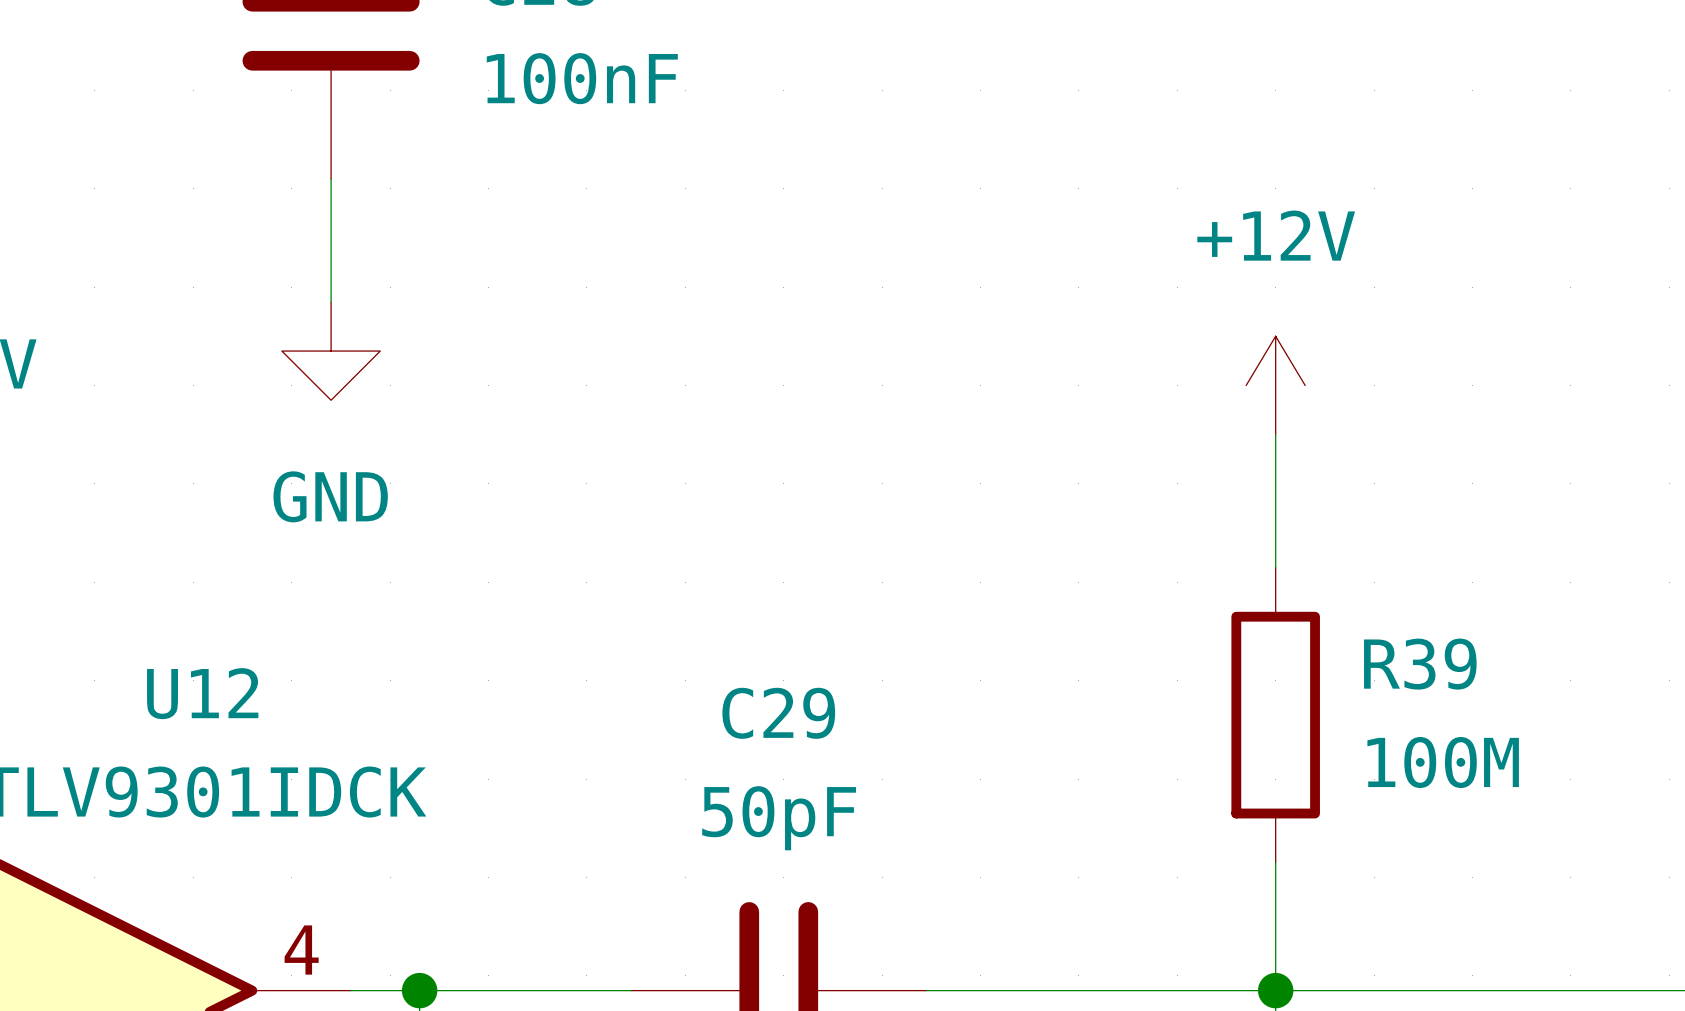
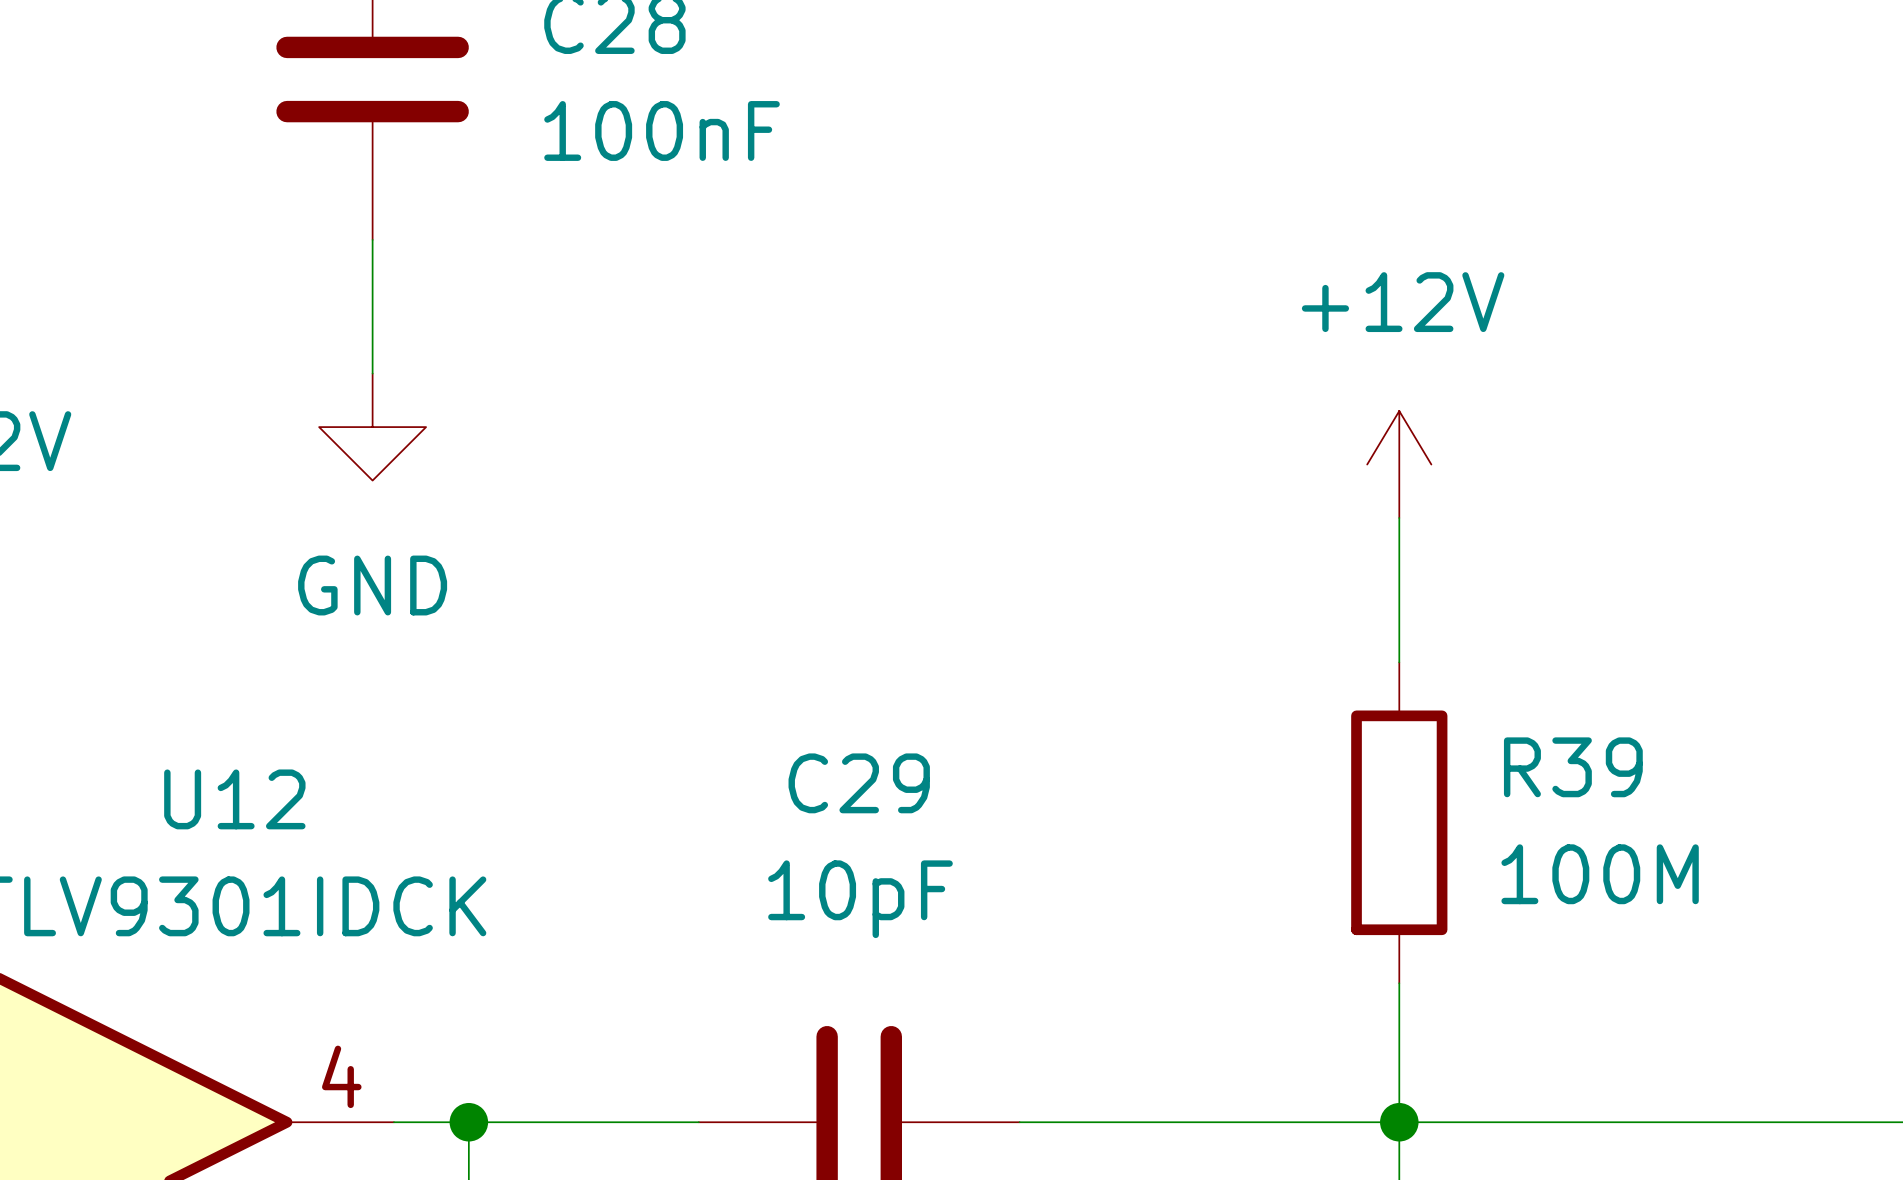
C29 name position: C29 (778, 713) -> C29 (859, 783)
C29 value: 50pF (779, 818) -> 10pF (860, 899)

